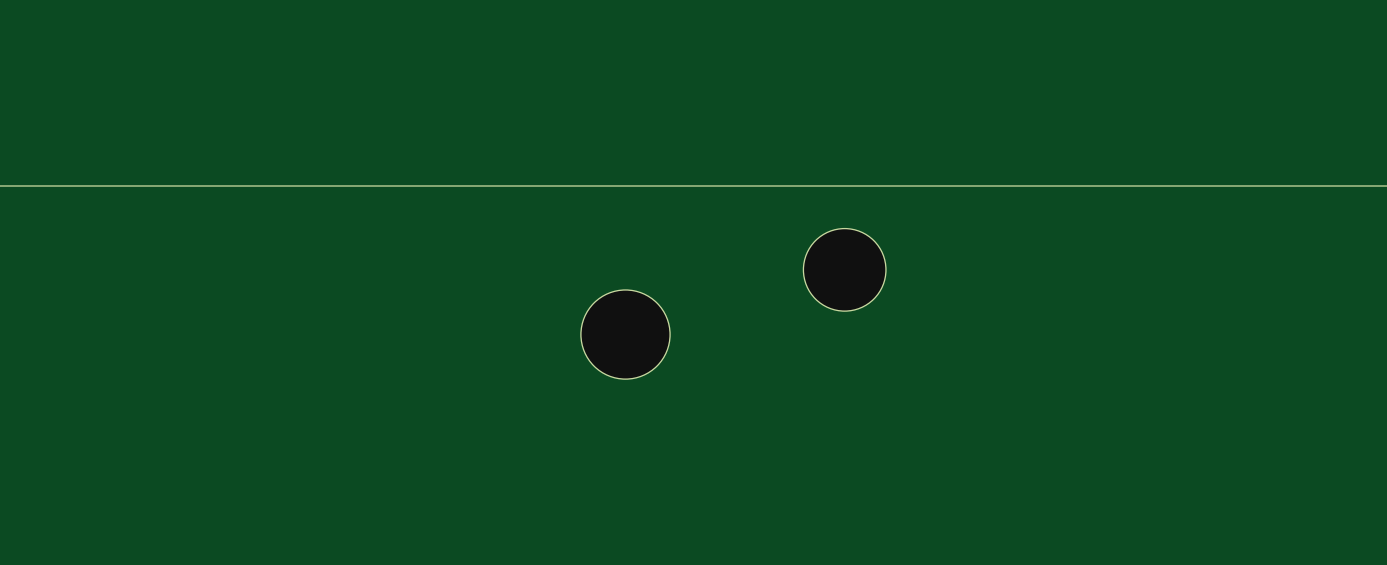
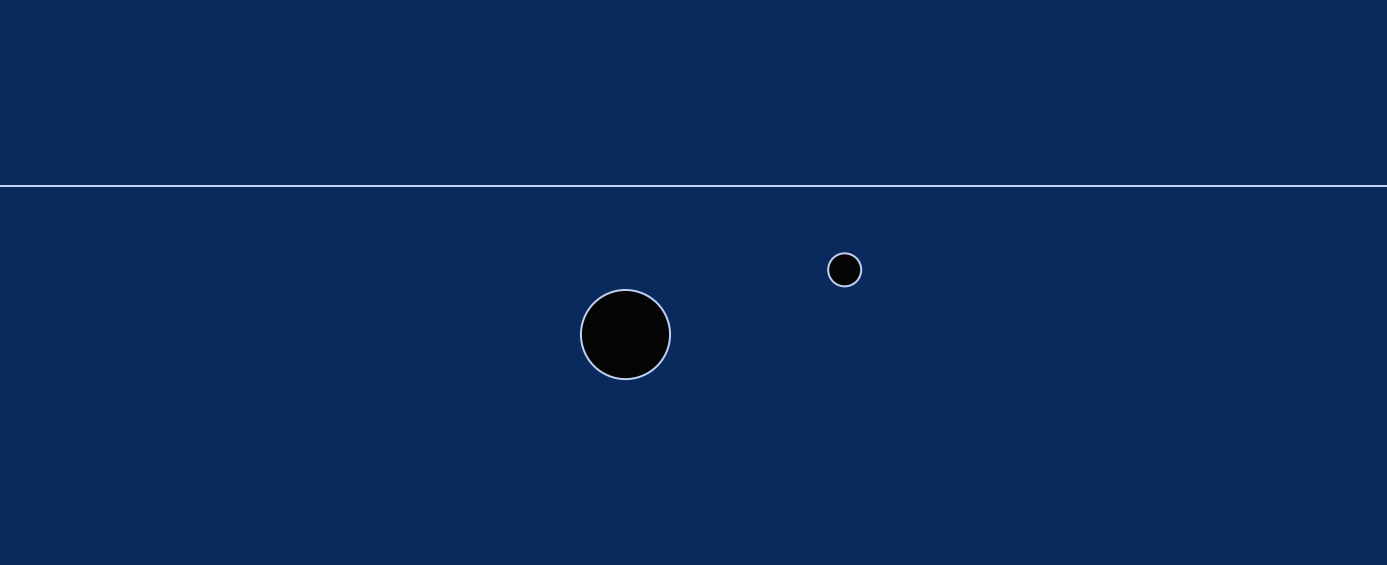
hole size: [803, 228, 886, 312] -> [828, 253, 862, 287]

